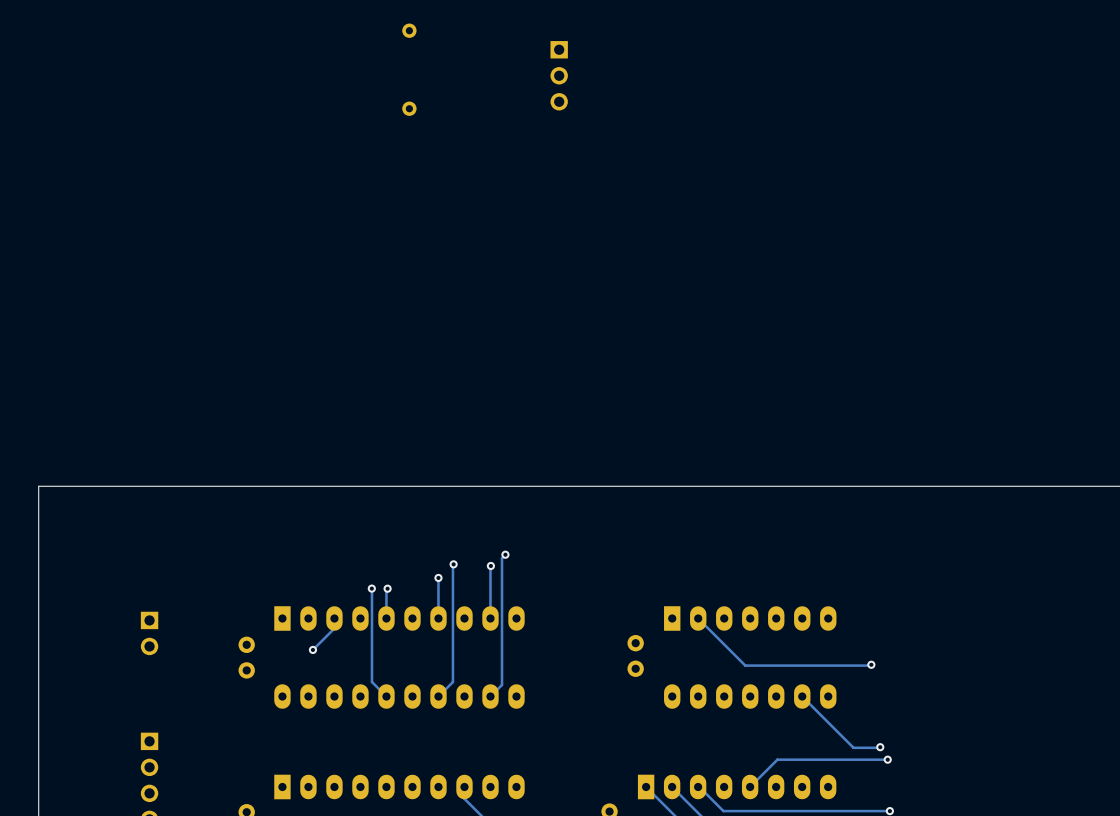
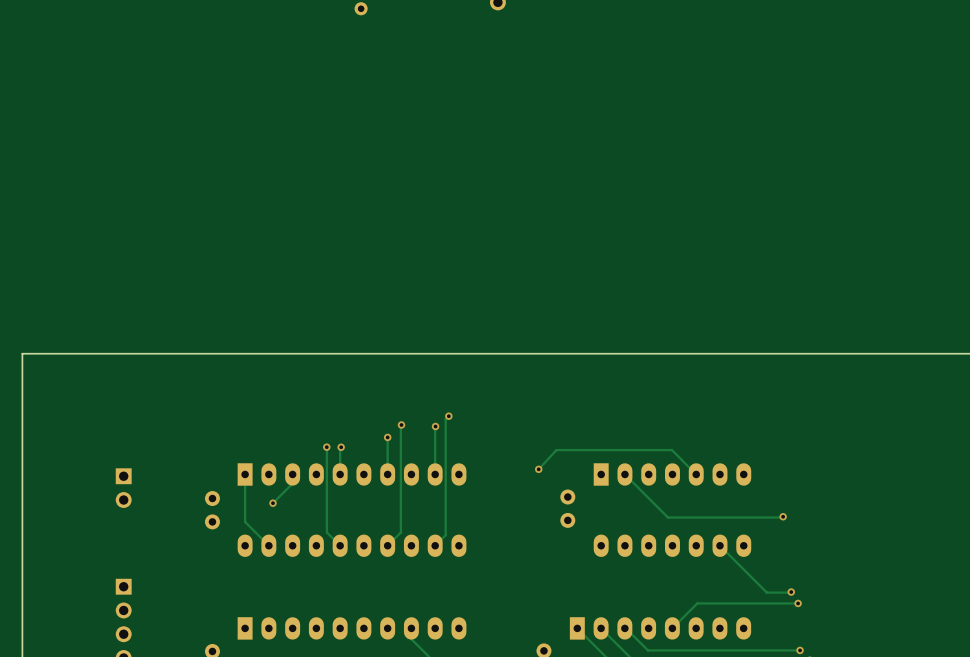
track: none -> (538, 467) (556, 450) (671, 450) (696, 474)
via: none -> (538, 469)
track: none -> (245, 474) (245, 521) (268, 545)

